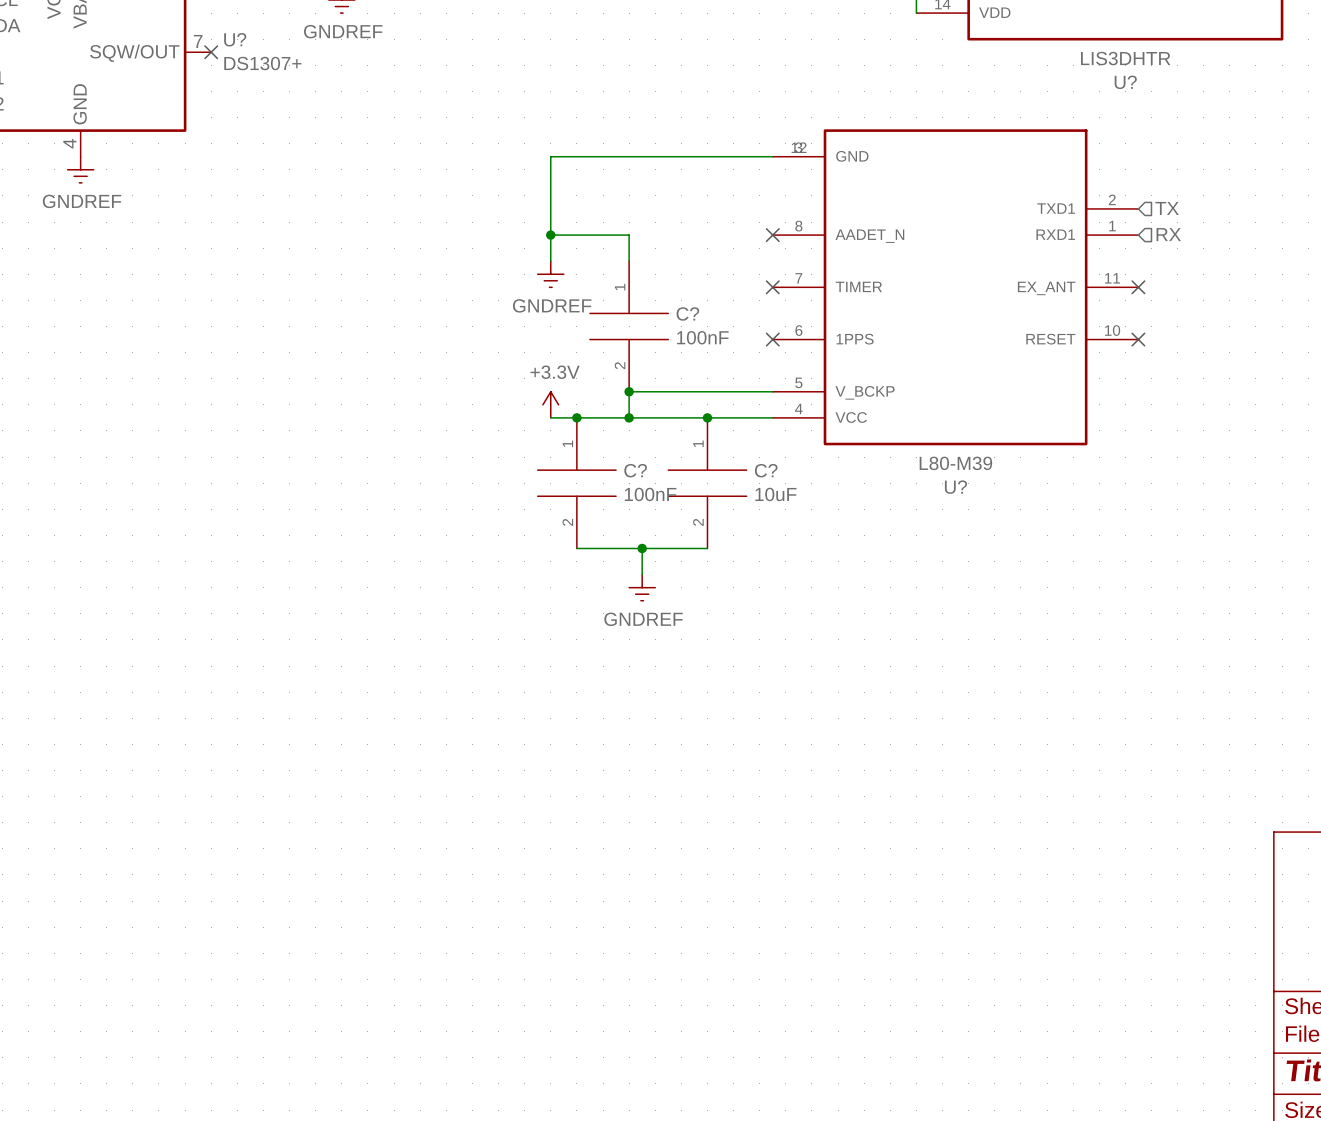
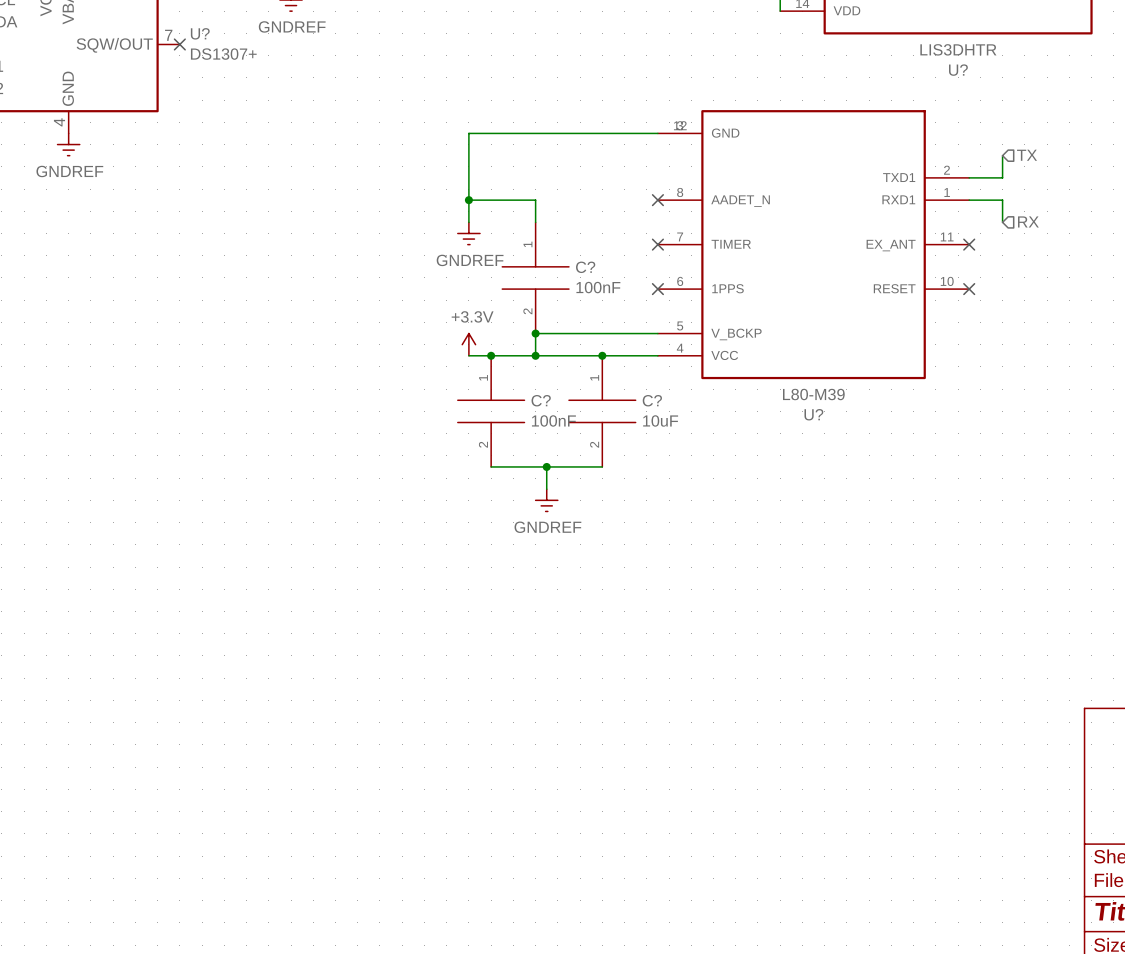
wire: none -> (1002, 155) (1002, 177) (969, 177)
hierarchical label position: TX (1167, 208) -> TX (1027, 155)
hierarchical label position: RX (1168, 234) -> RX (1028, 221)
wire: none -> (969, 200) (1002, 200) (1002, 222)

